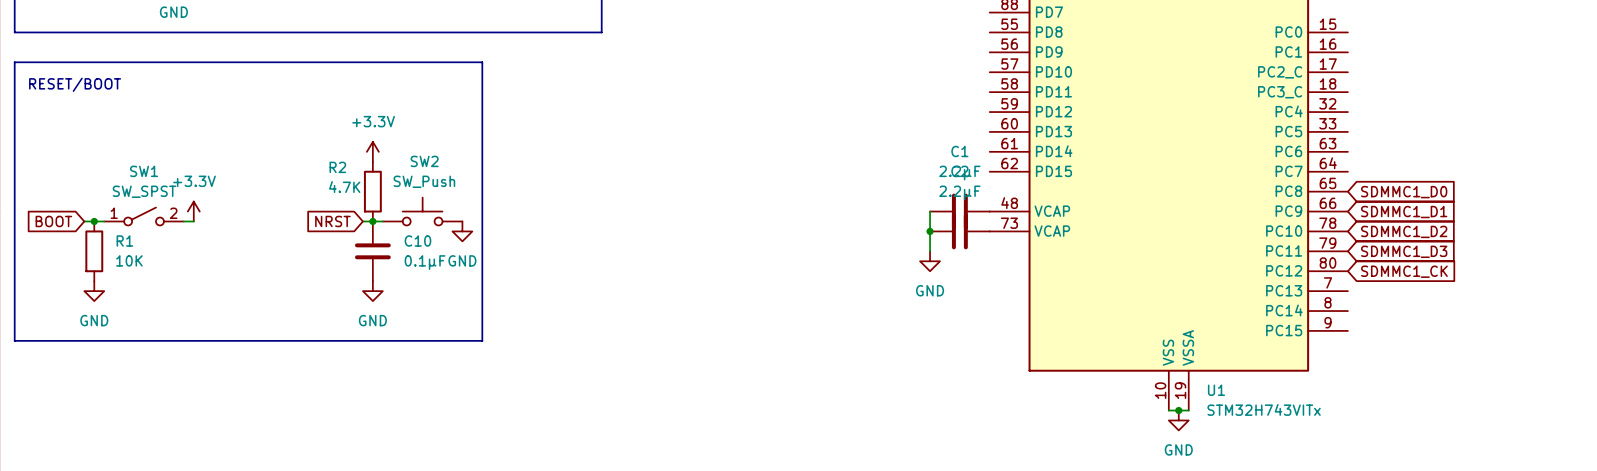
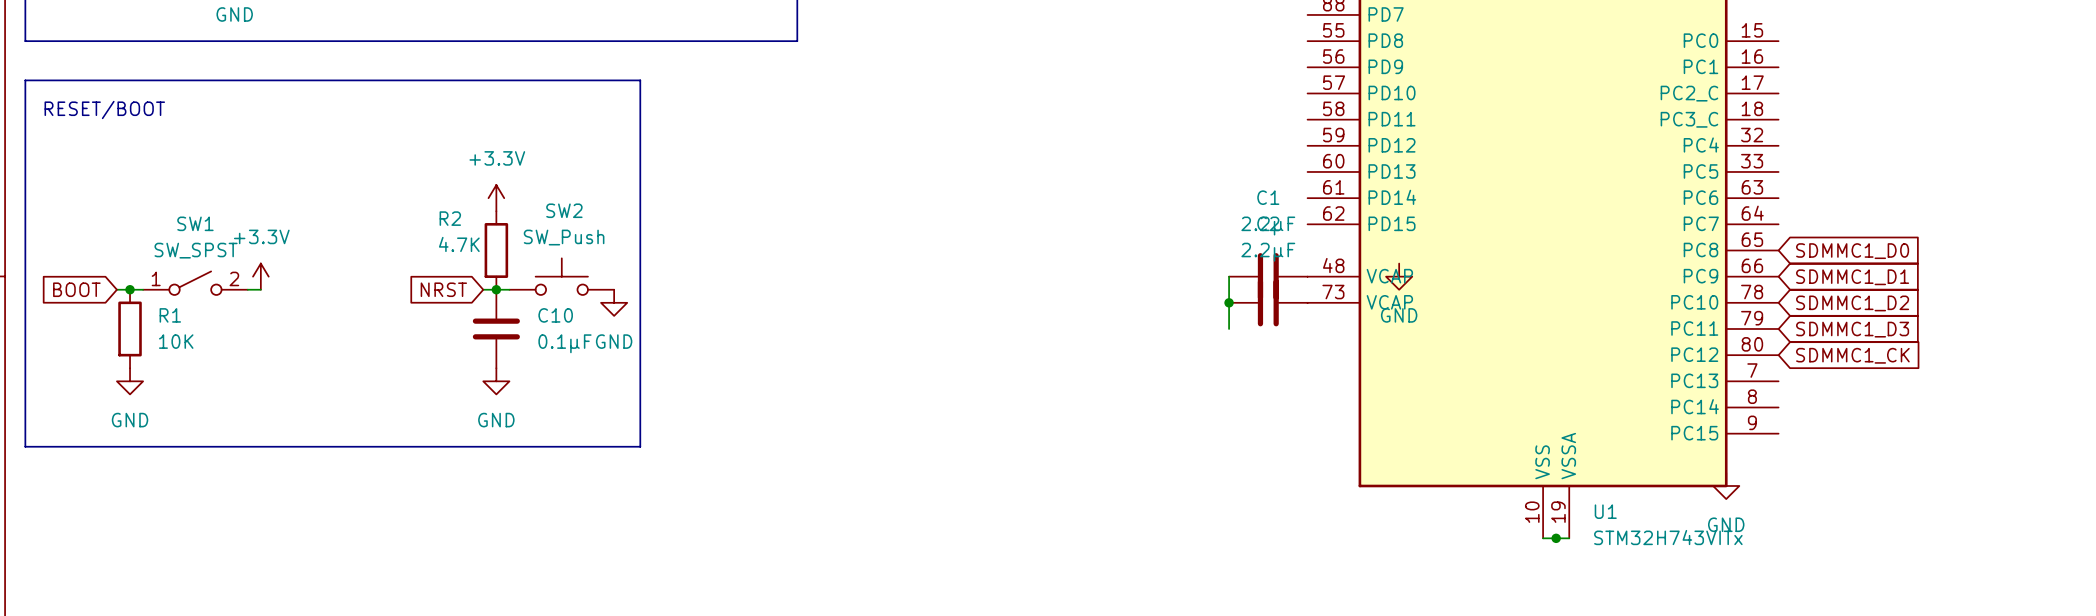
power symbol: none -> GND (1399, 276)
power symbol: GND (930, 261) -> none
power symbol: none -> GND (1726, 485)
power symbol: GND (1178, 420) -> none

